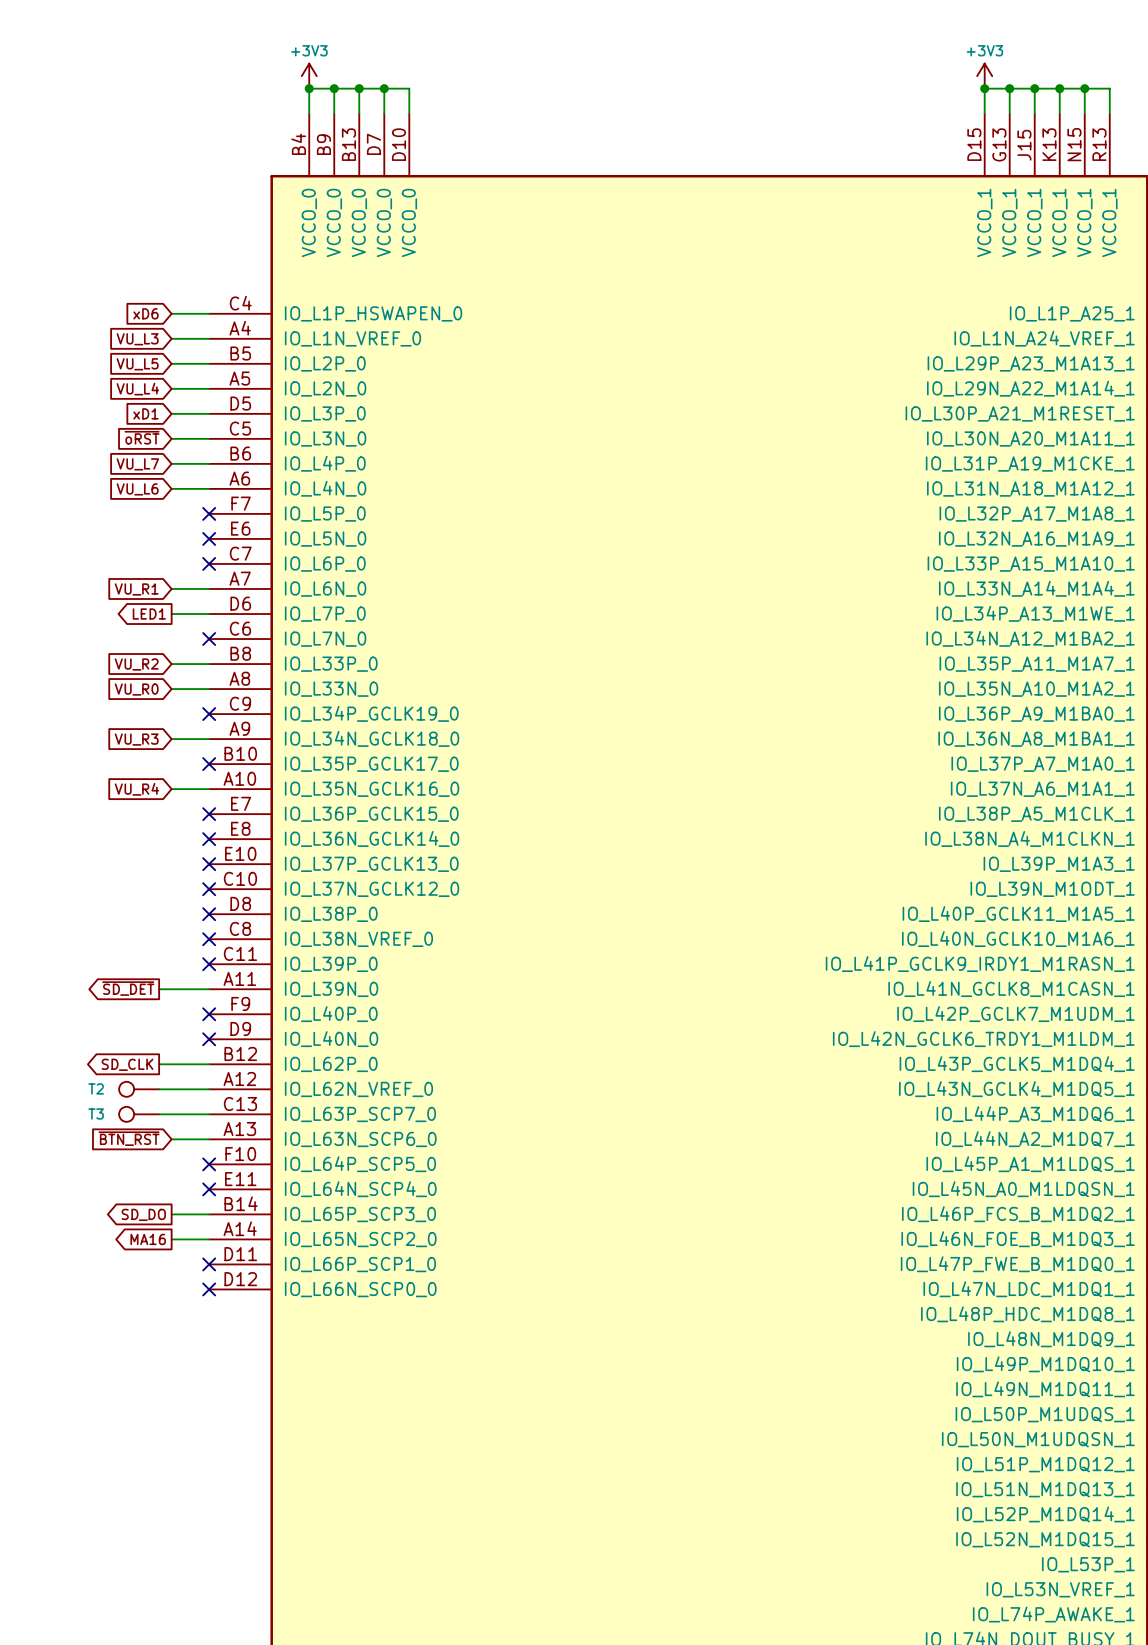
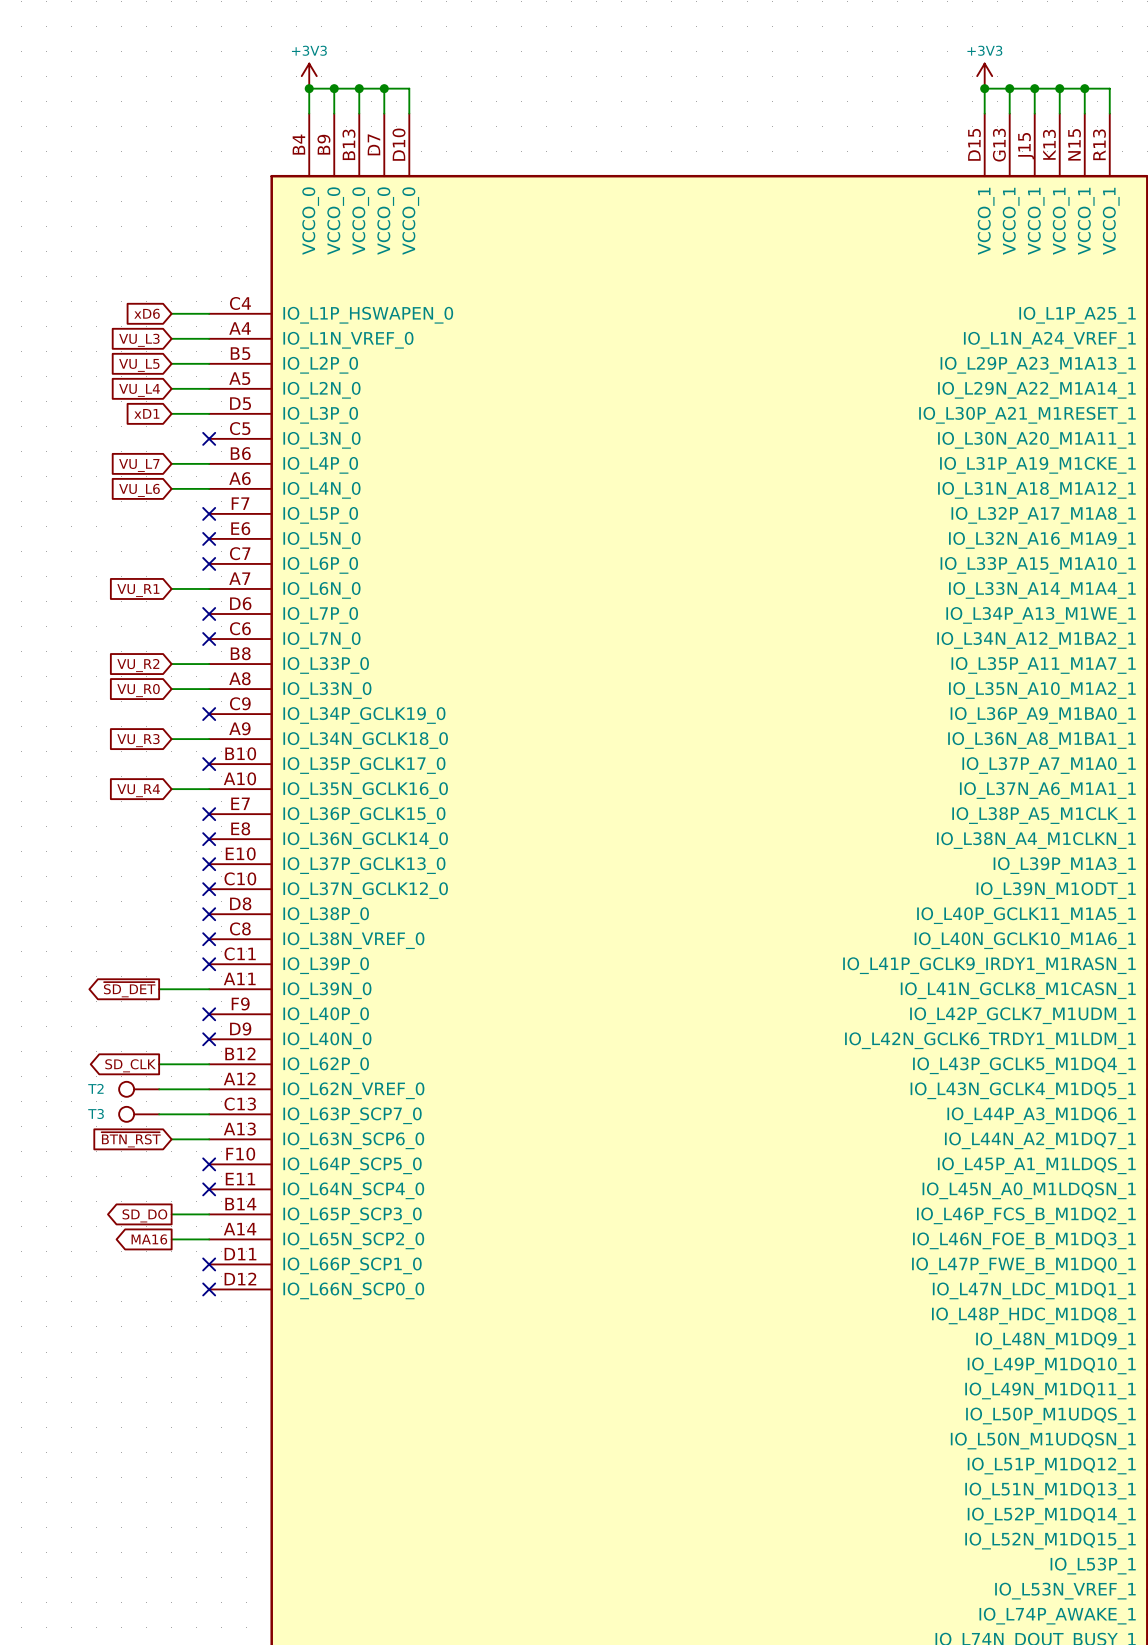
global label: ~{oRST} (142, 437) -> none
wire: (171, 438) (209, 438) -> none
no-connect mark: none -> (209, 438)
global label: LED1 (149, 614) -> none
wire: (171, 614) (209, 614) -> none
no-connect mark: none -> (209, 614)

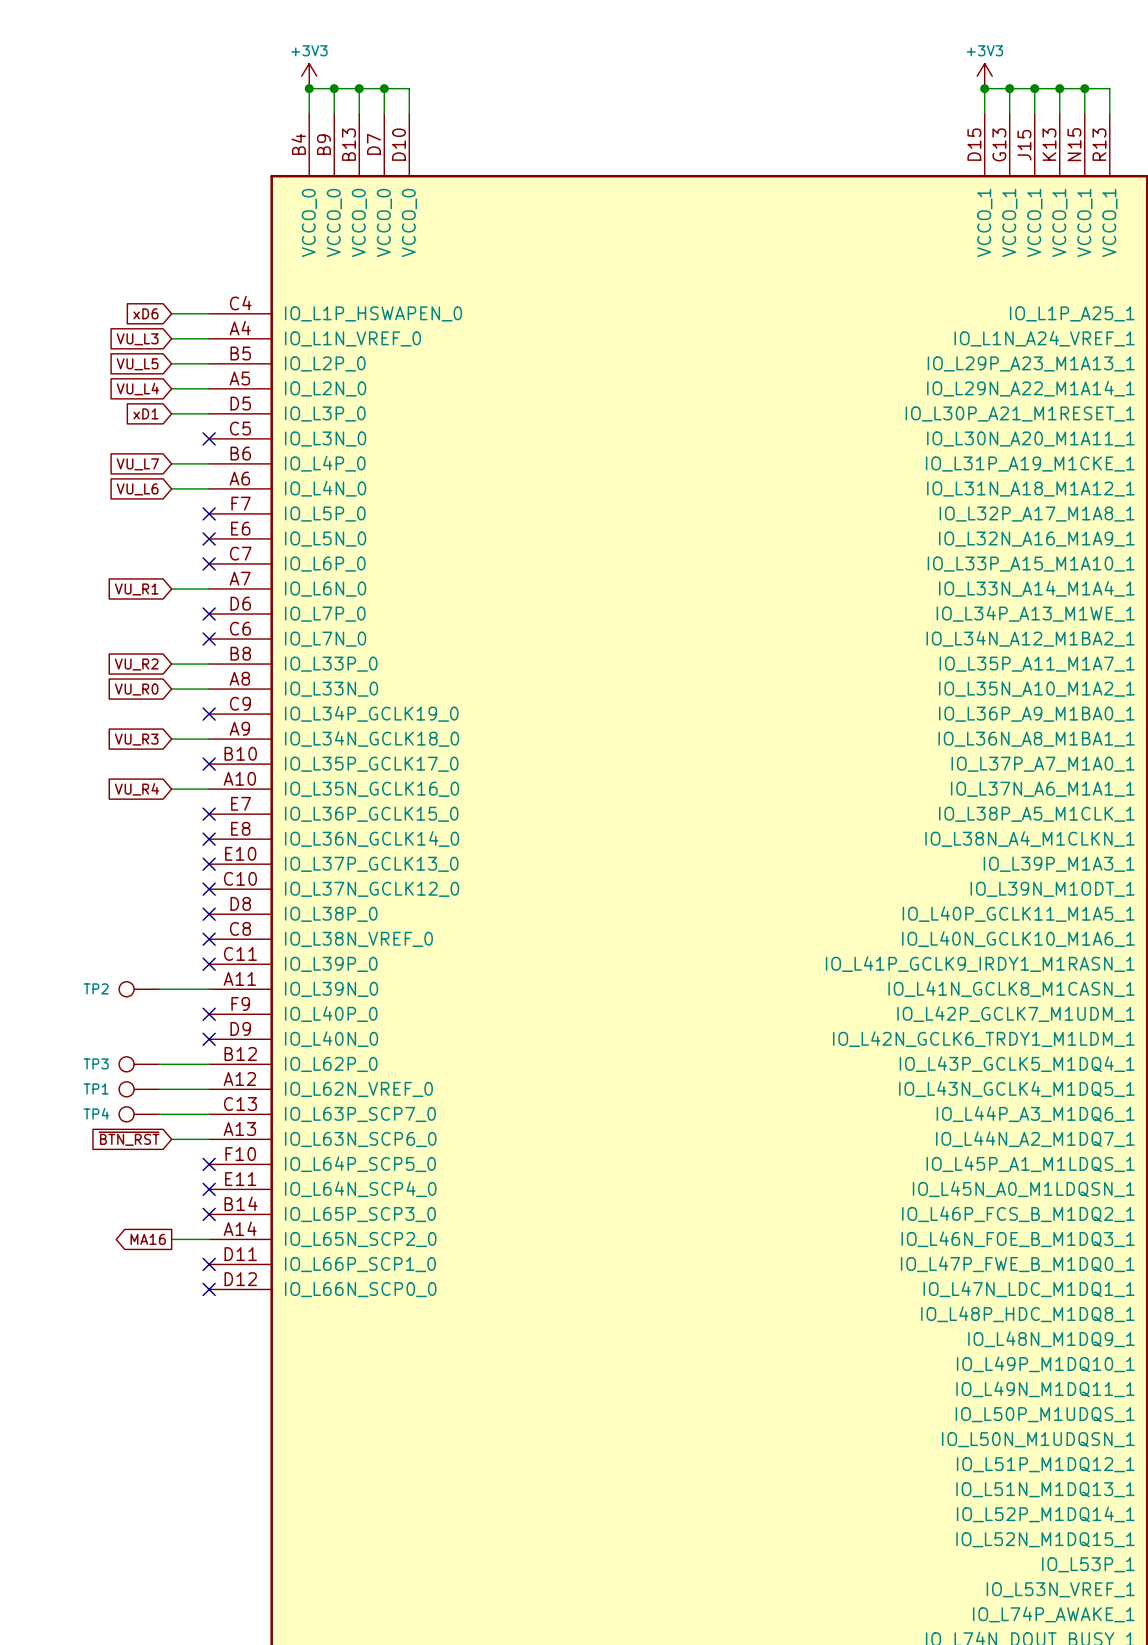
global label: ~{SD_DET} (129, 989) -> none
TP2: none -> (139, 989)
TP3: none -> (139, 1064)
global label: SD_CLK (130, 1065) -> none
T2 name: T2 (95, 1088) -> TP1 (96, 1088)
T3 name: T3 (96, 1113) -> TP4 (96, 1113)
wire: (171, 1214) (209, 1214) -> none
no-connect mark: none -> (209, 1214)
global label: SD_DO (144, 1215) -> none

